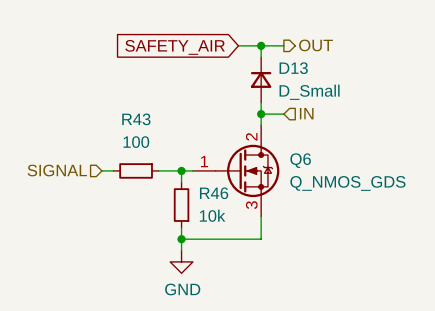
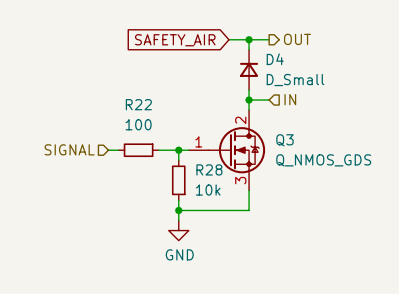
D13 name: D13 (293, 68) -> D4 (275, 59)
R43 name: R43 (136, 119) -> R22 (138, 104)
Q6 name: Q6 (300, 160) -> Q3 (284, 140)
R46 name: R46 (214, 193) -> R28 (209, 169)

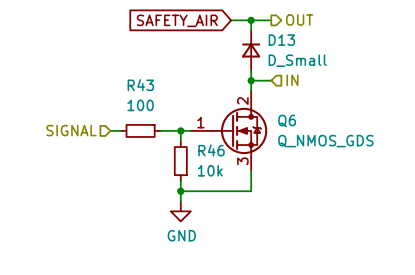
D4 name: D4 (275, 59) -> D13 (281, 40)
R22 name: R22 (138, 104) -> R43 (140, 85)
Q3 name: Q3 (284, 140) -> Q6 (287, 120)
R28 name: R28 (209, 169) -> R46 (211, 150)

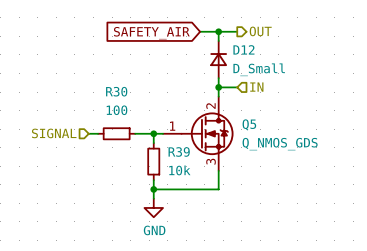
D13 name: D13 (281, 40) -> D12 (243, 49)
R43 name: R43 (140, 85) -> R30 (116, 91)
Q6 name: Q6 (287, 120) -> Q5 (249, 124)
R46 name: R46 (211, 150) -> R39 (179, 151)

